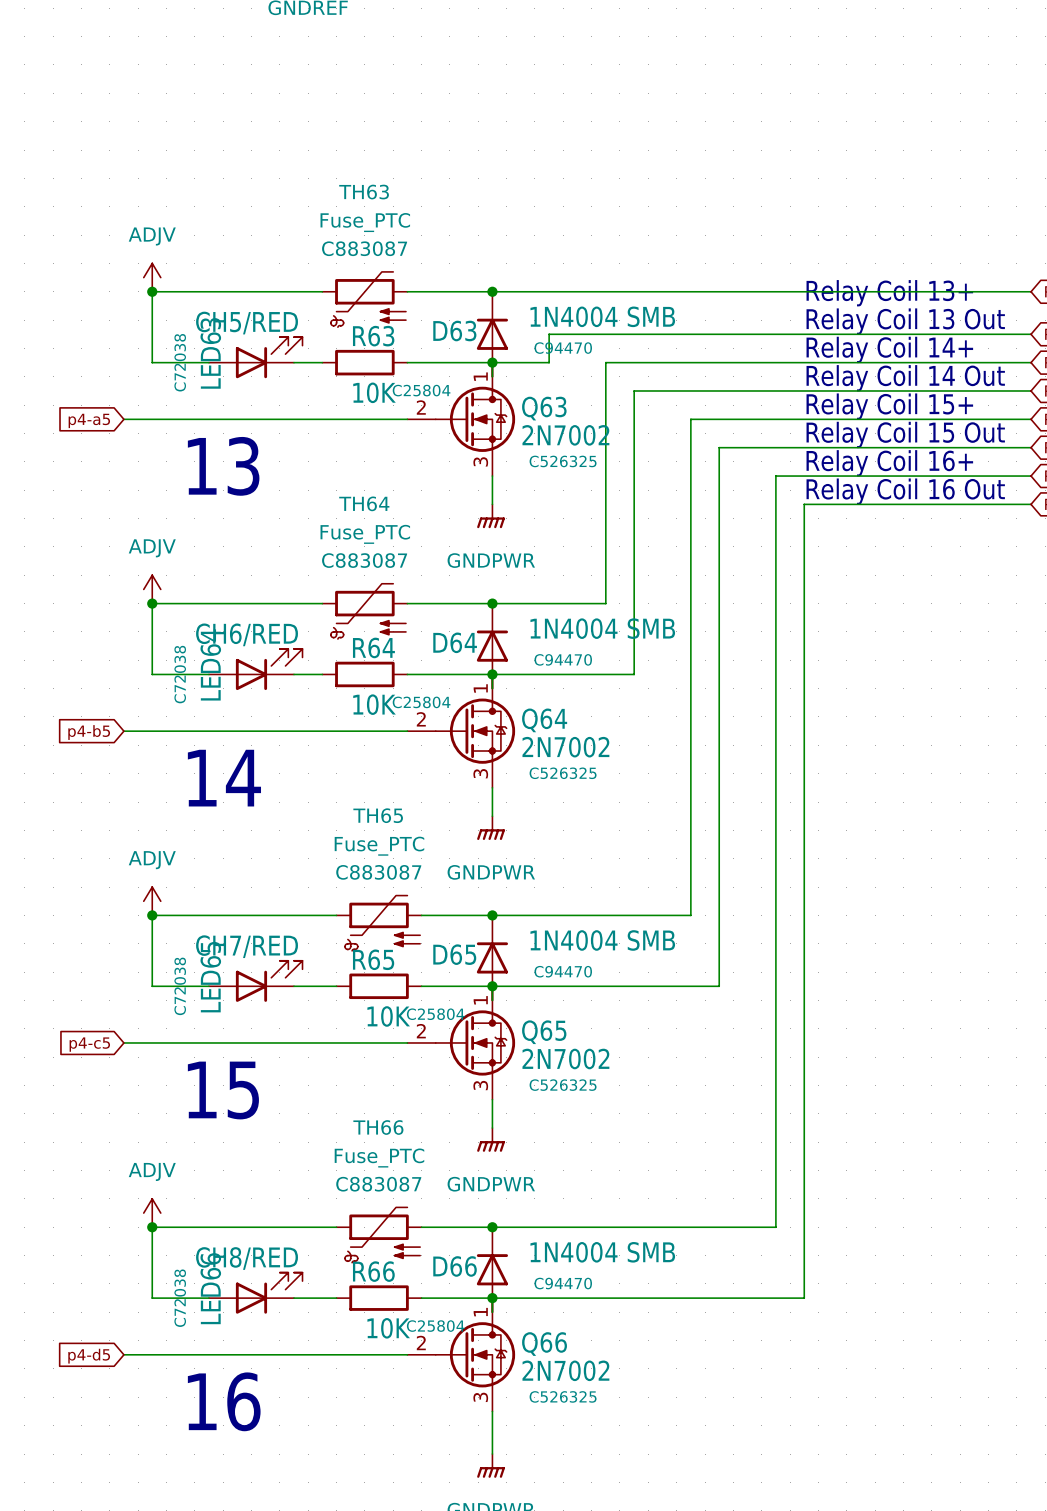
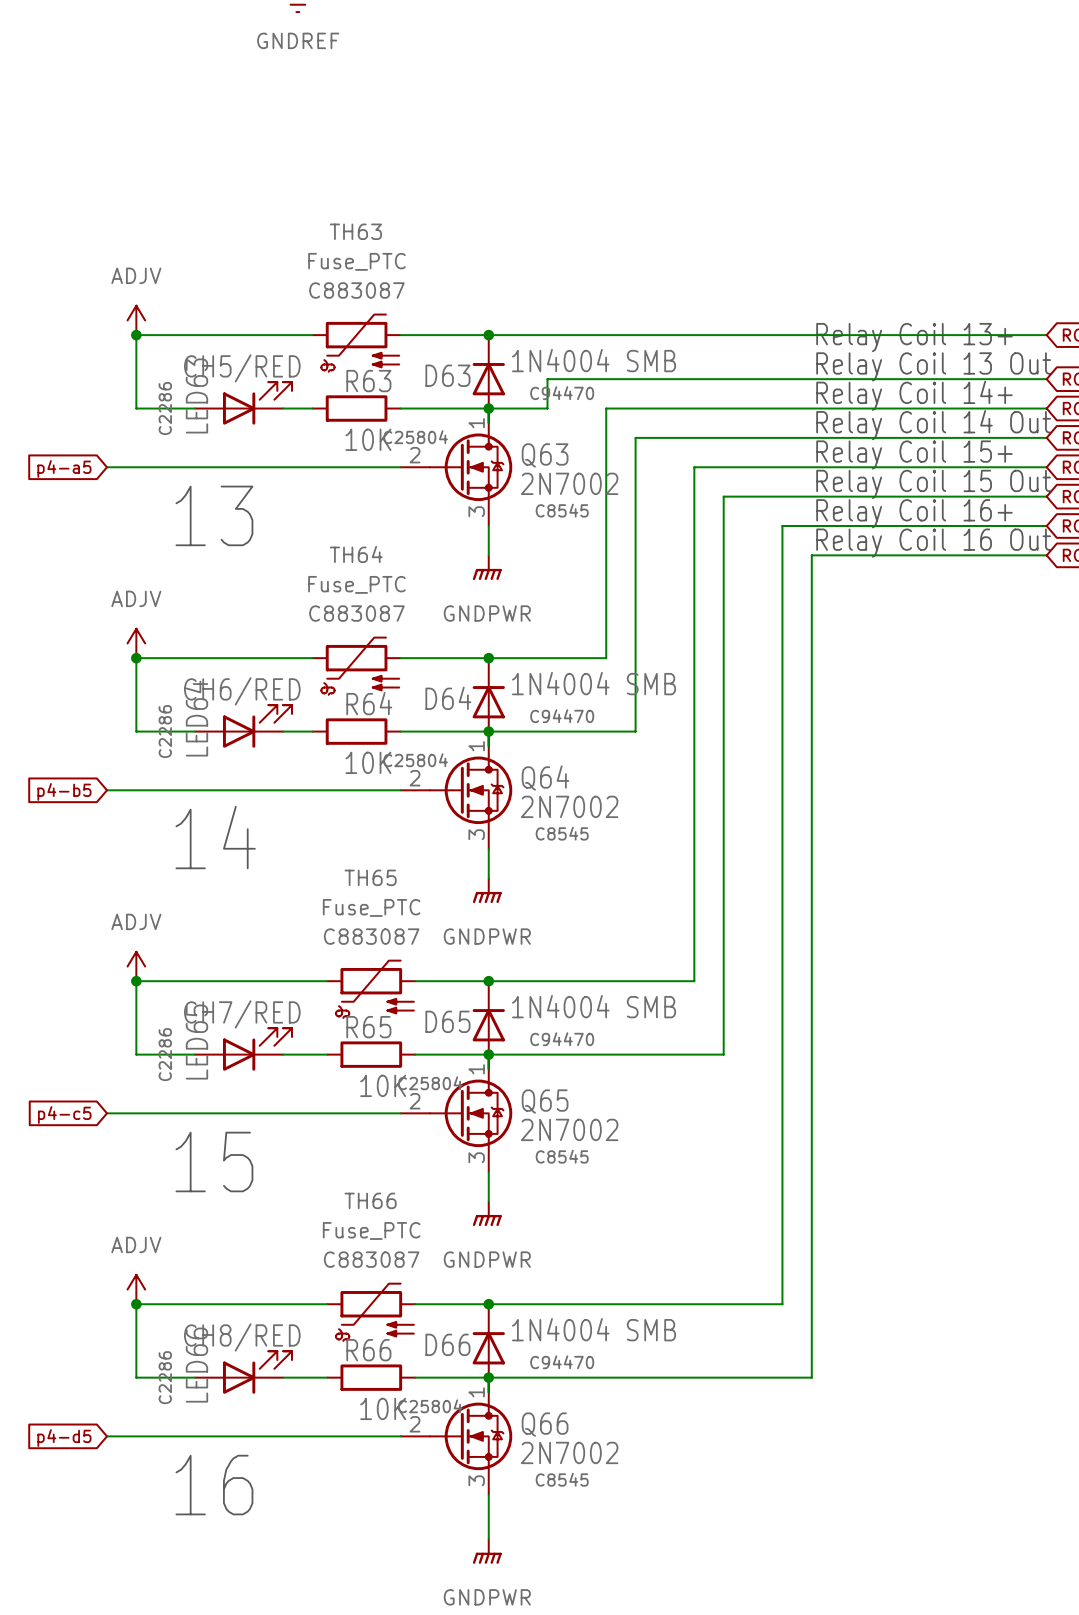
LED63 text: C72038 (180, 362) -> C2286 (165, 408)
Q63 text: C526325 (563, 461) -> C8545 (562, 510)
LED64 text: C72038 (180, 674) -> C2286 (165, 731)
Q64 text: C526325 (563, 773) -> C8545 (562, 833)
LED65 text: C72038 (180, 986) -> C2286 (165, 1054)
Q65 text: C526325 (563, 1085) -> C8545 (562, 1156)
LED66 text: C72038 (180, 1298) -> C2286 (165, 1377)
Q66 text: C526325 (563, 1396) -> C8545 (562, 1479)

